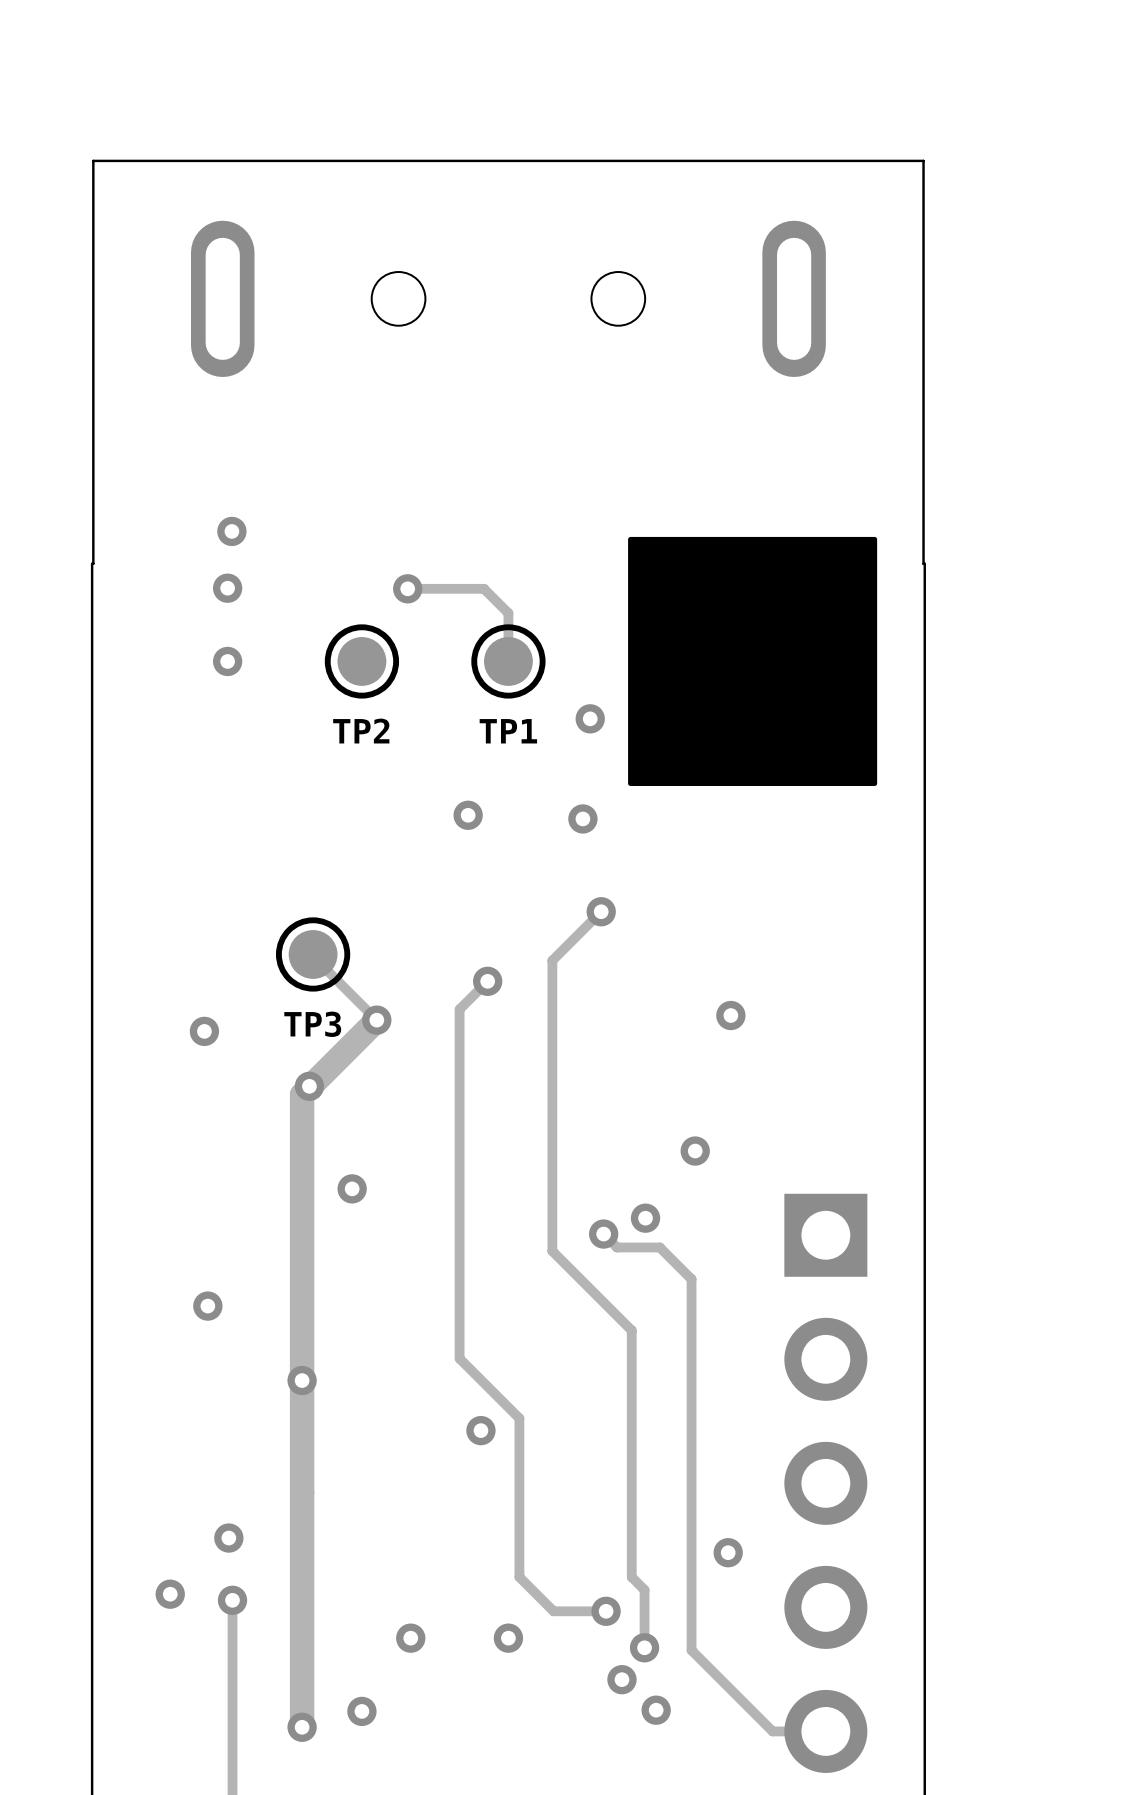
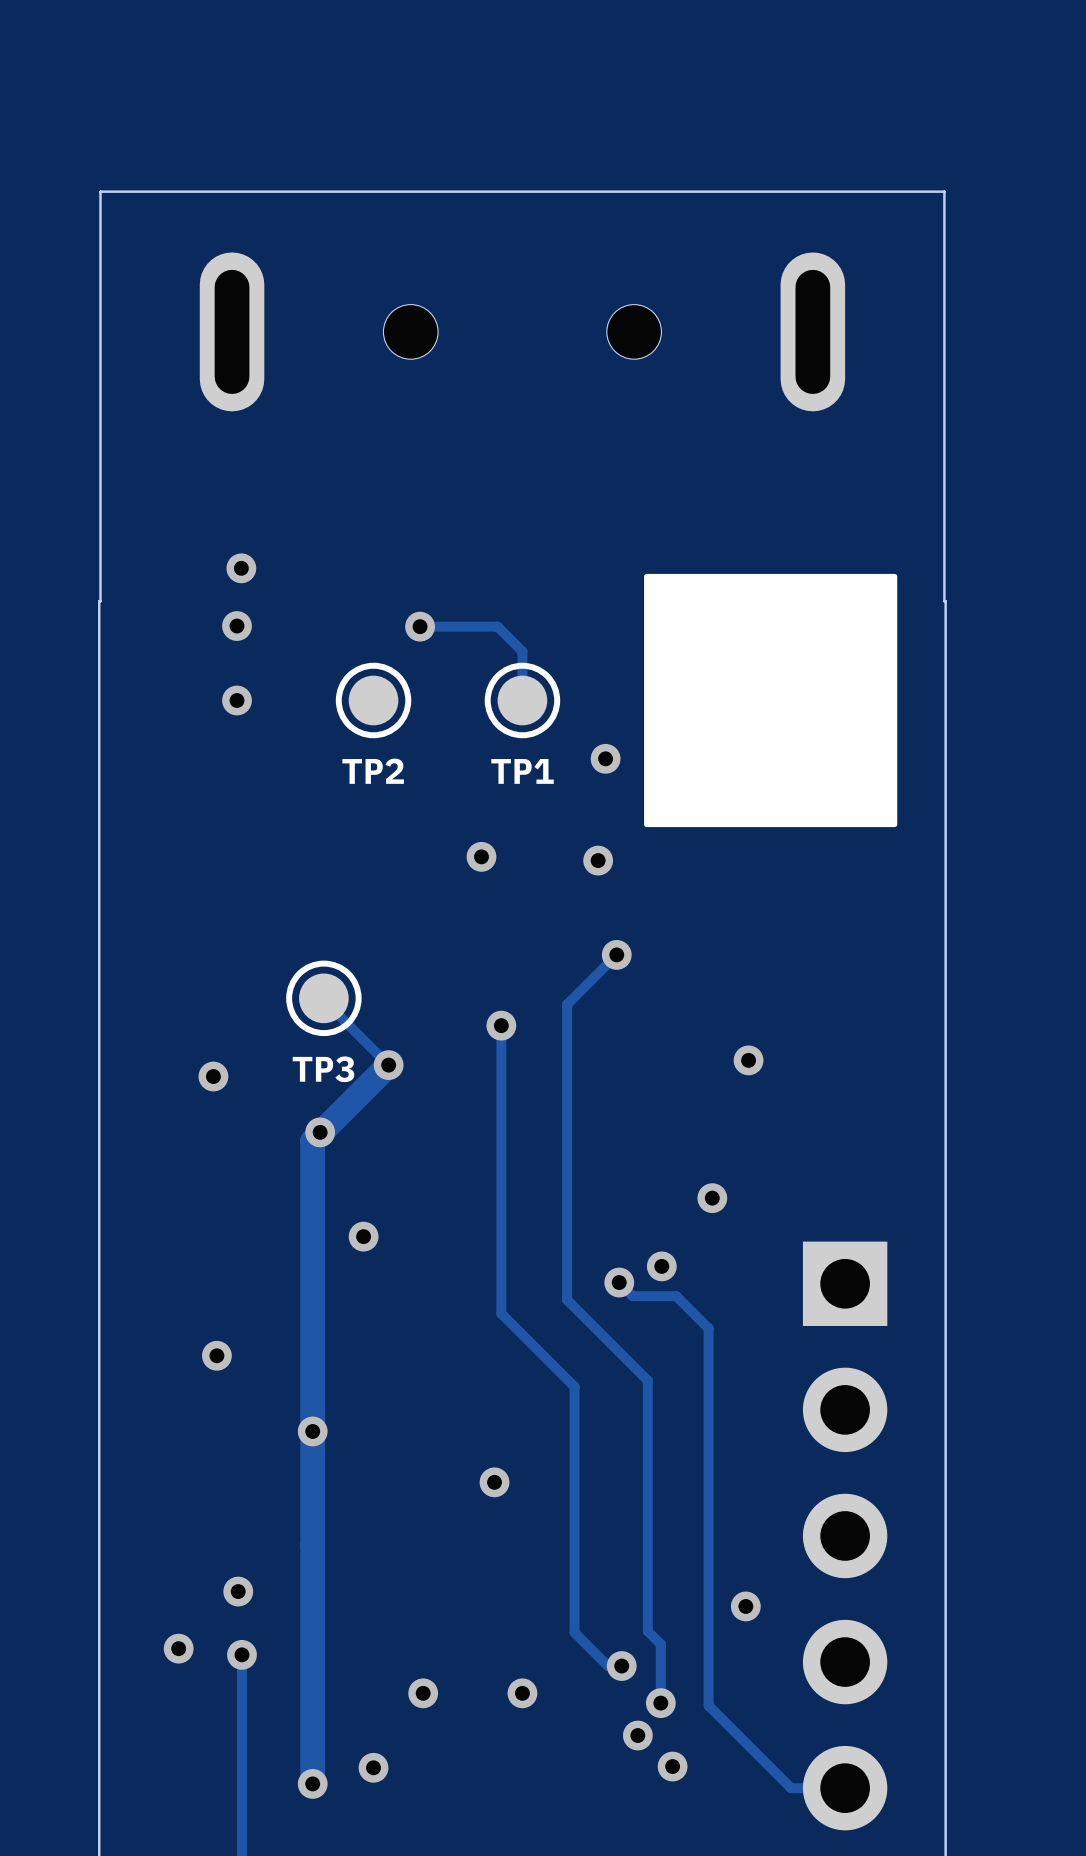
track: (487, 981) (459, 1009) (459, 1358) (519, 1418) (519, 1577) (553, 1611) (592, 1611) -> (501, 1025) (501, 1313) (574, 1386) (574, 1632) (608, 1666)

